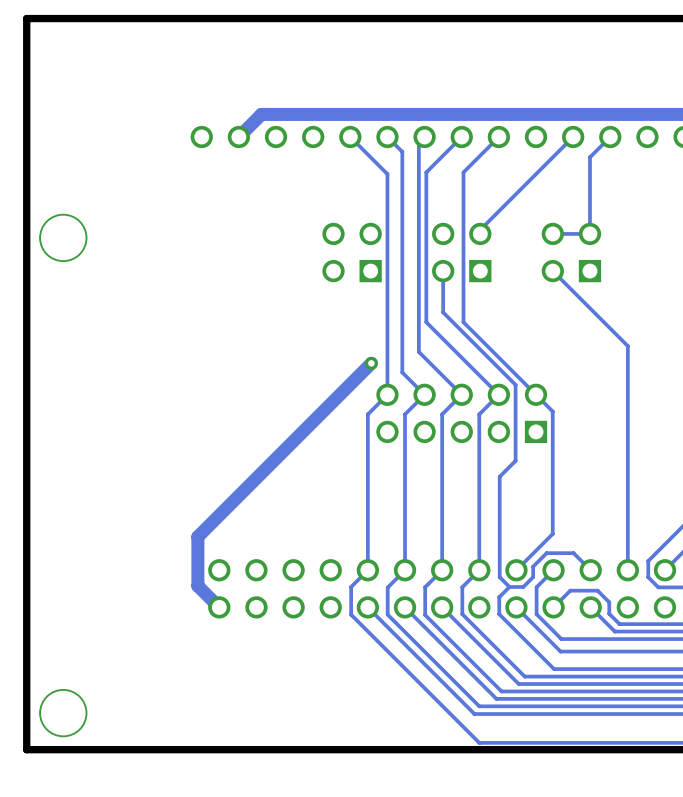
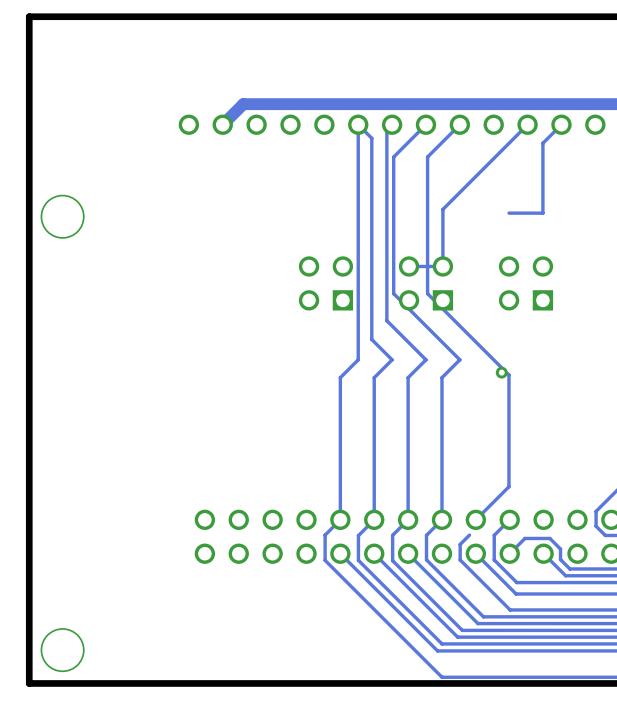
track: (350, 137) (387, 174) -> (358, 124) (358, 158)
track: none -> (442, 213) (442, 266) (409, 266)
part position: (352, 252) -> (325, 283)
part position: (461, 252) -> (425, 283)
part position: (571, 252) -> (525, 283)
track: (443, 271) (443, 312) (515, 384) (515, 460) (499, 476) (499, 577) (509, 586) (523, 586) (533, 577) (533, 566) (546, 553) (573, 553) (590, 570) -> none
track: (552, 271) (627, 346) (627, 570) -> none
track: (371, 363) (197, 536) (197, 585) (219, 607) -> none
via: (371, 363) -> none
via: none -> (501, 372)
part: (461, 413) -> none

